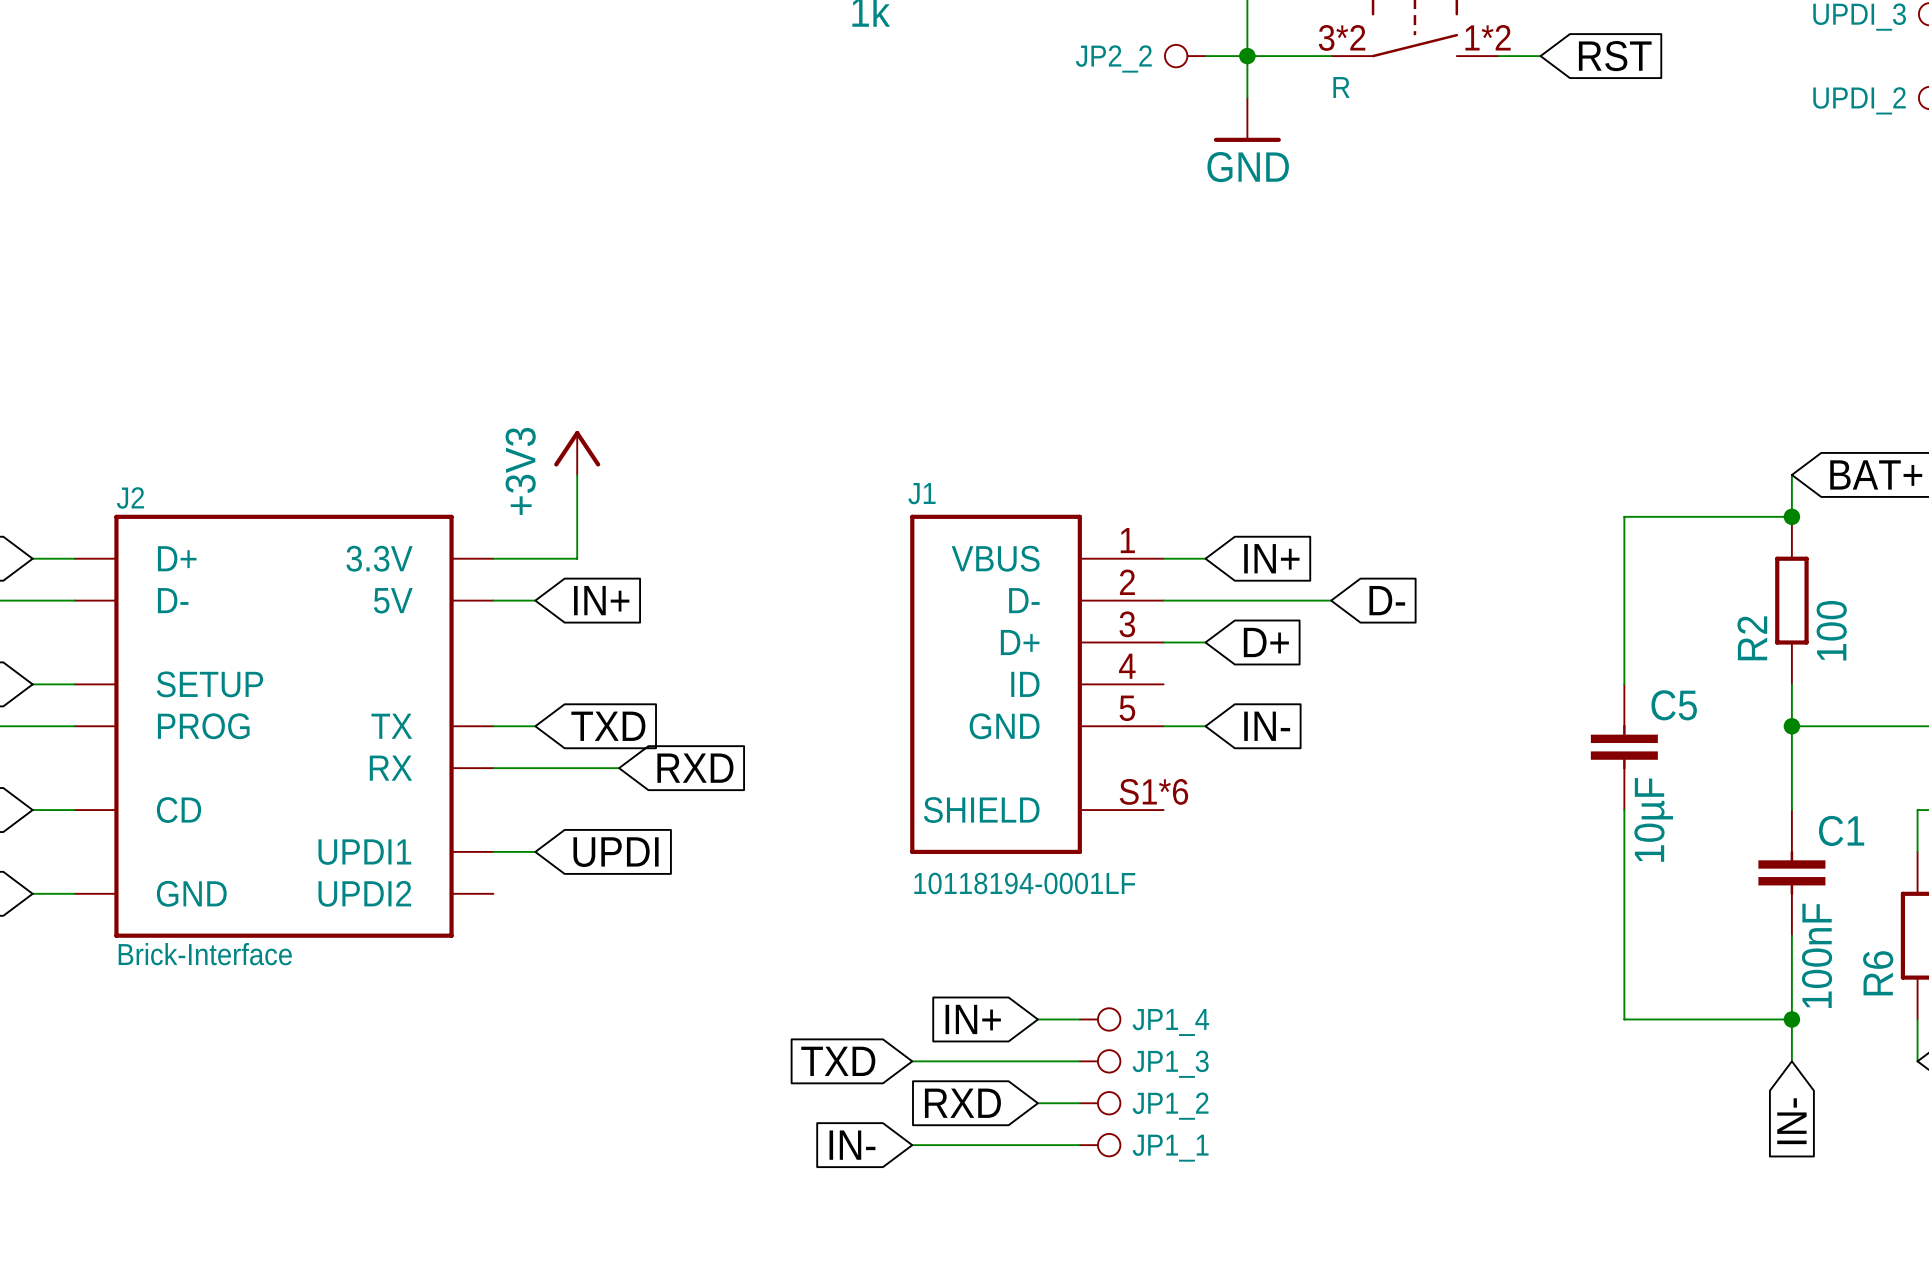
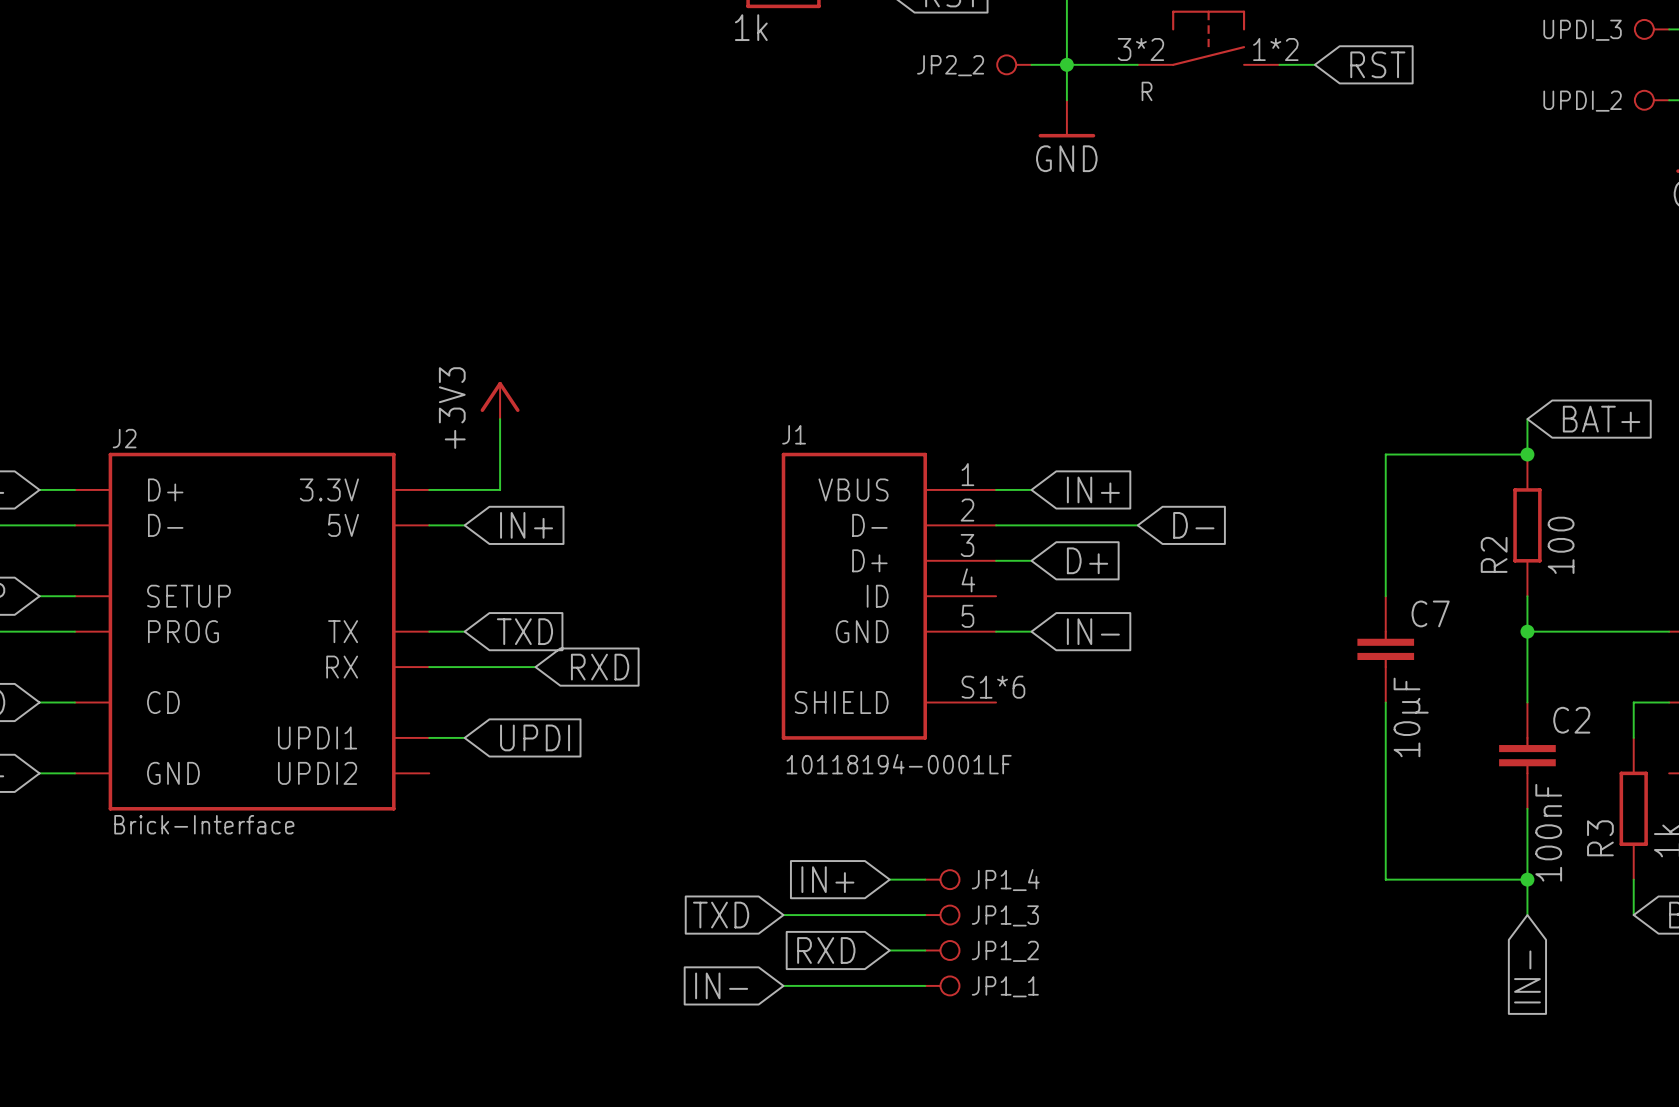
C5 name: C5 (1674, 705) -> C7 (1430, 613)
C1 name: C1 (1841, 830) -> C2 (1571, 720)
R6 name: R6 (1878, 973) -> R3 (1600, 838)

